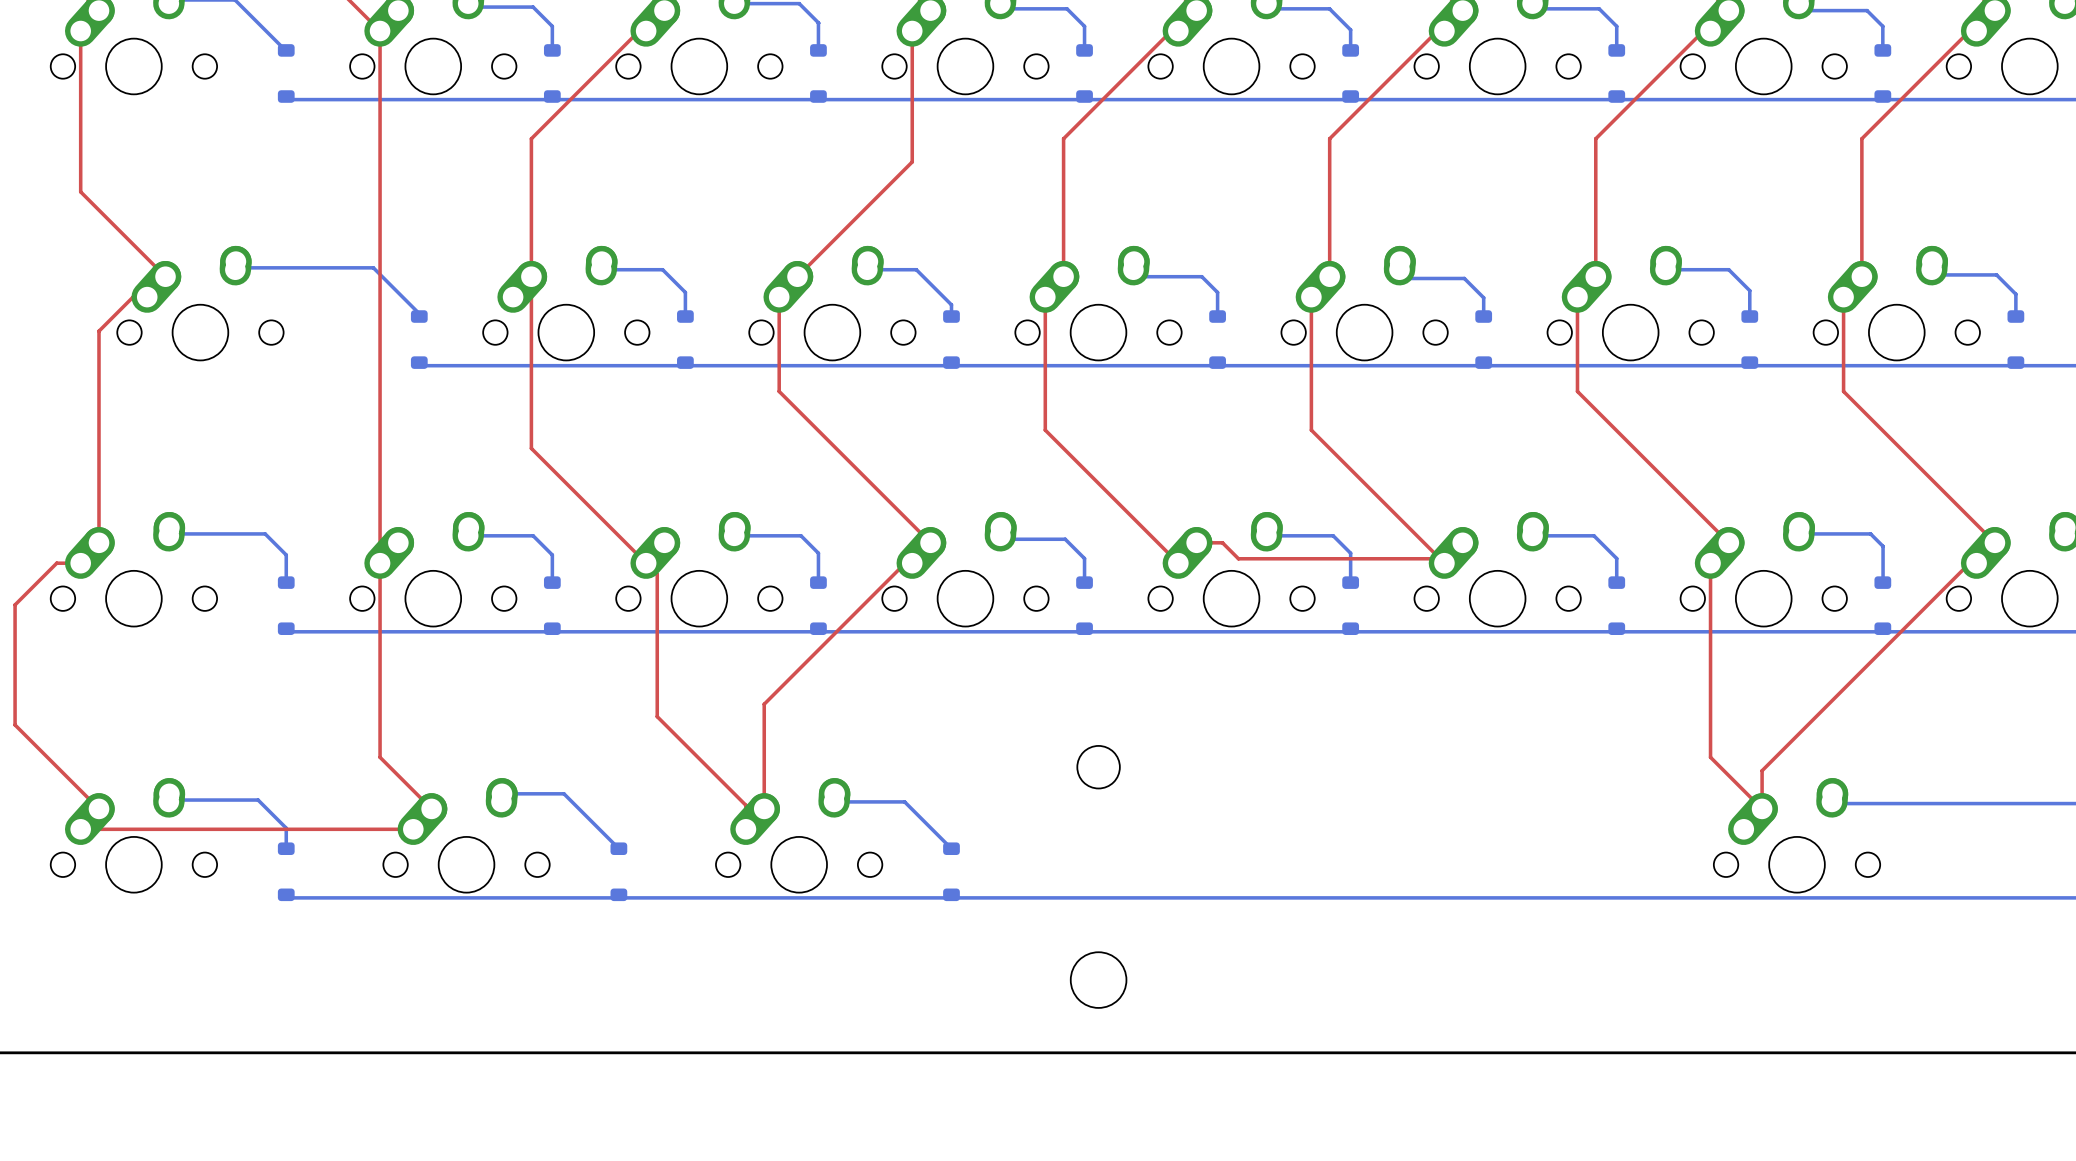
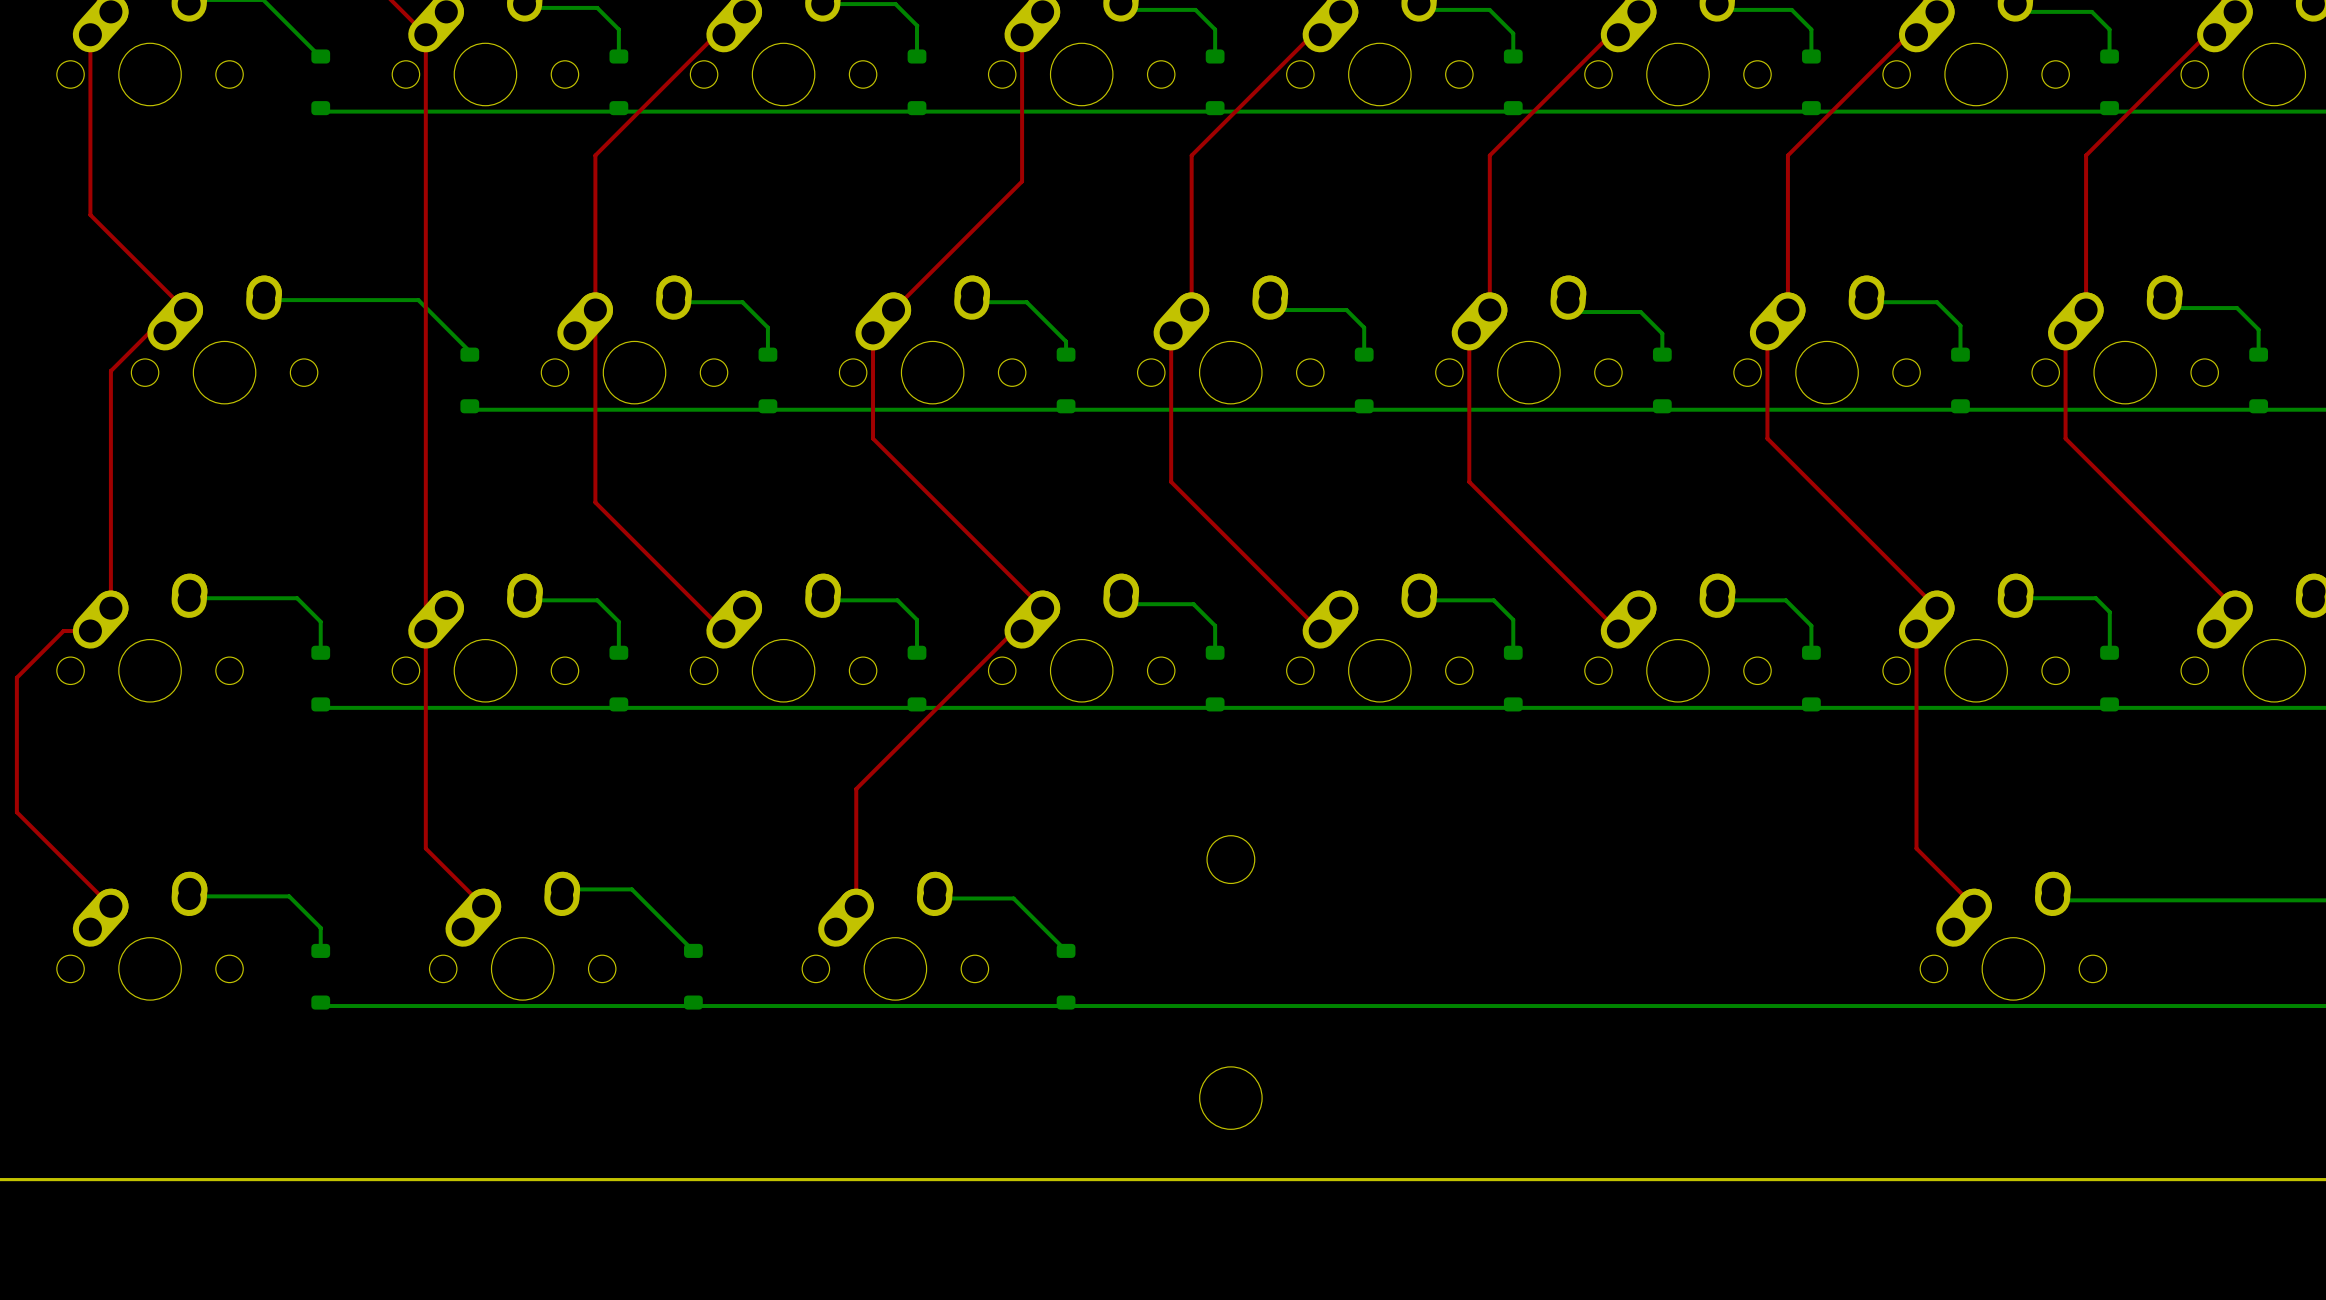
top track: (1196, 542) (1222, 542) (1238, 558) (1440, 558) -> none
top track: (646, 563) (657, 574) (657, 716) (745, 805) (745, 829) -> none
top track: (1976, 563) (1969, 563) (1762, 770) (1762, 808) -> none
top track: (80, 829) (413, 829) -> none

